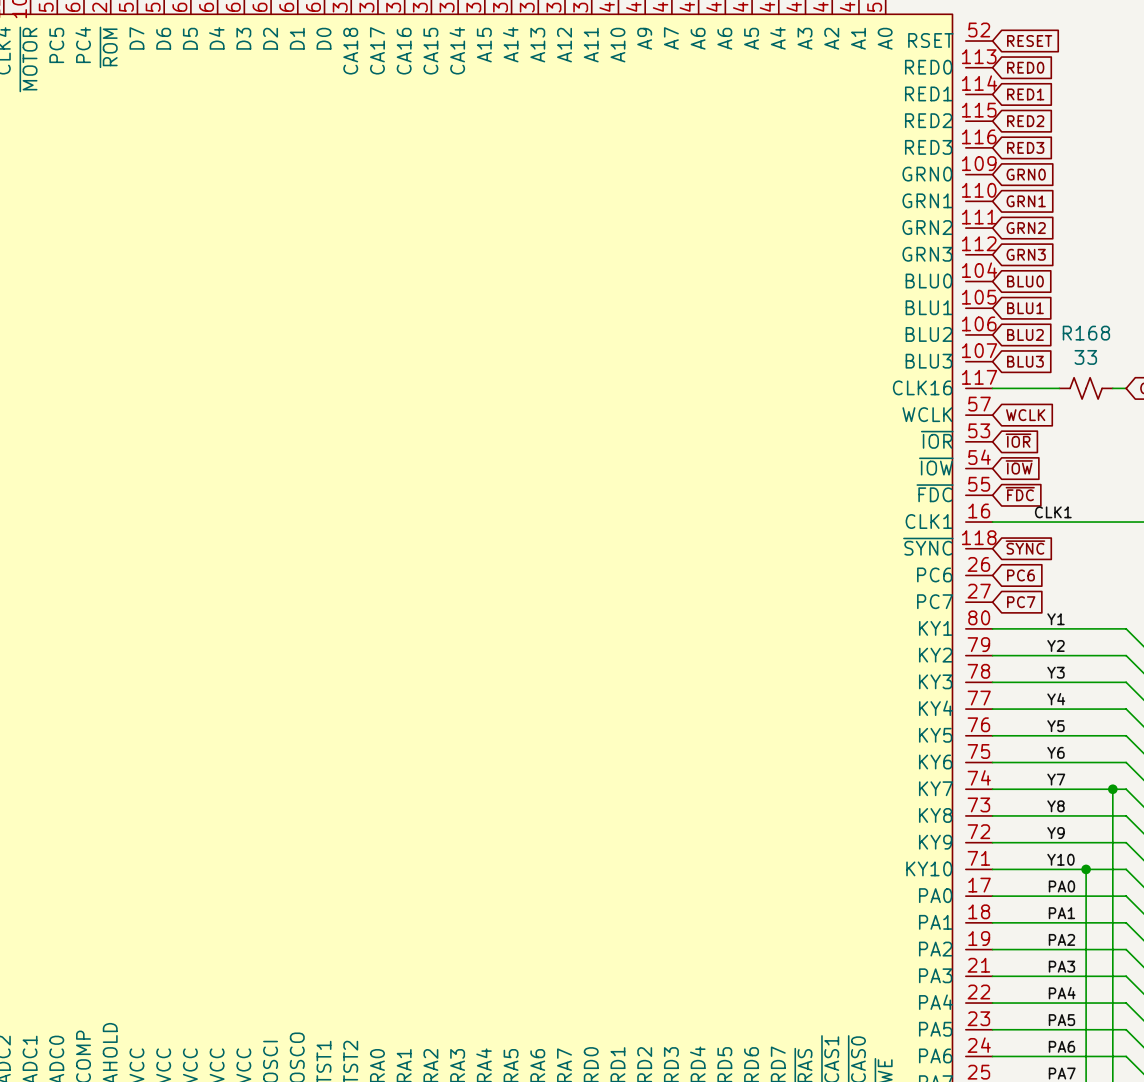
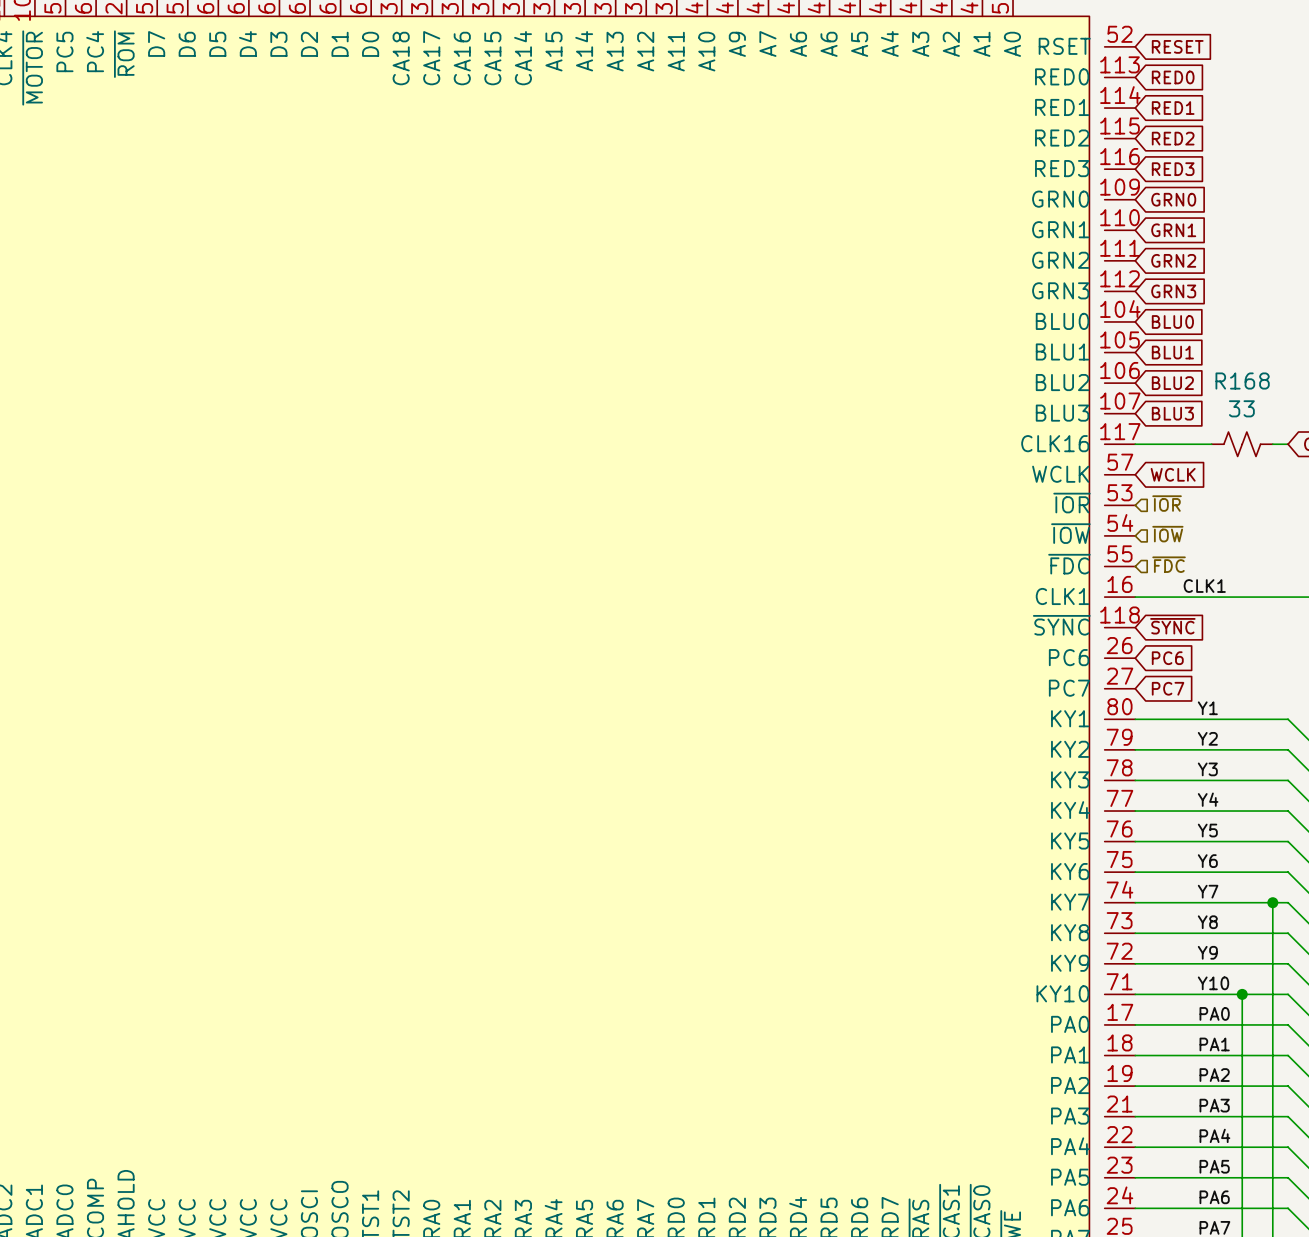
global label: ~{IOR} (1018, 440) -> none
hierarchical label: none -> ~{IOR} (1167, 503)
hierarchical label: none -> ~{IOW} (1167, 534)
global label: ~{IOW} (1019, 467) -> none
hierarchical label: none -> ~{FDC} (1169, 564)
global label: ~{FDC} (1020, 494) -> none

